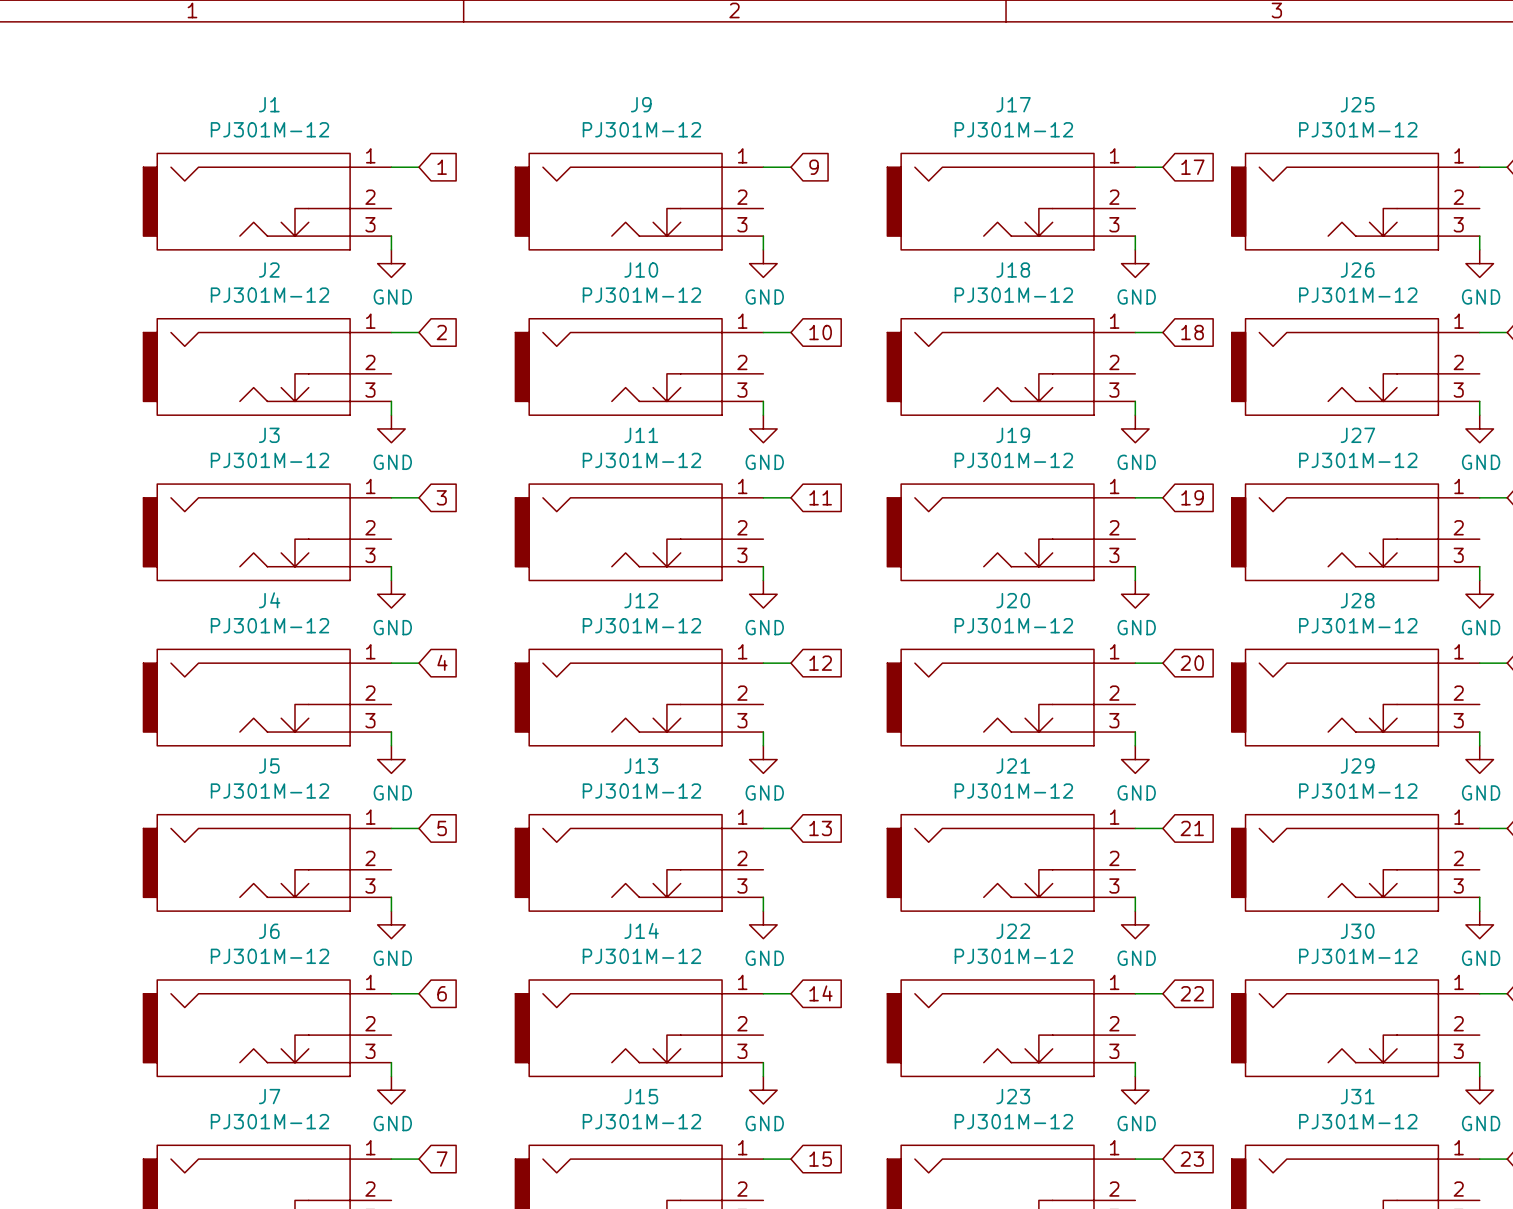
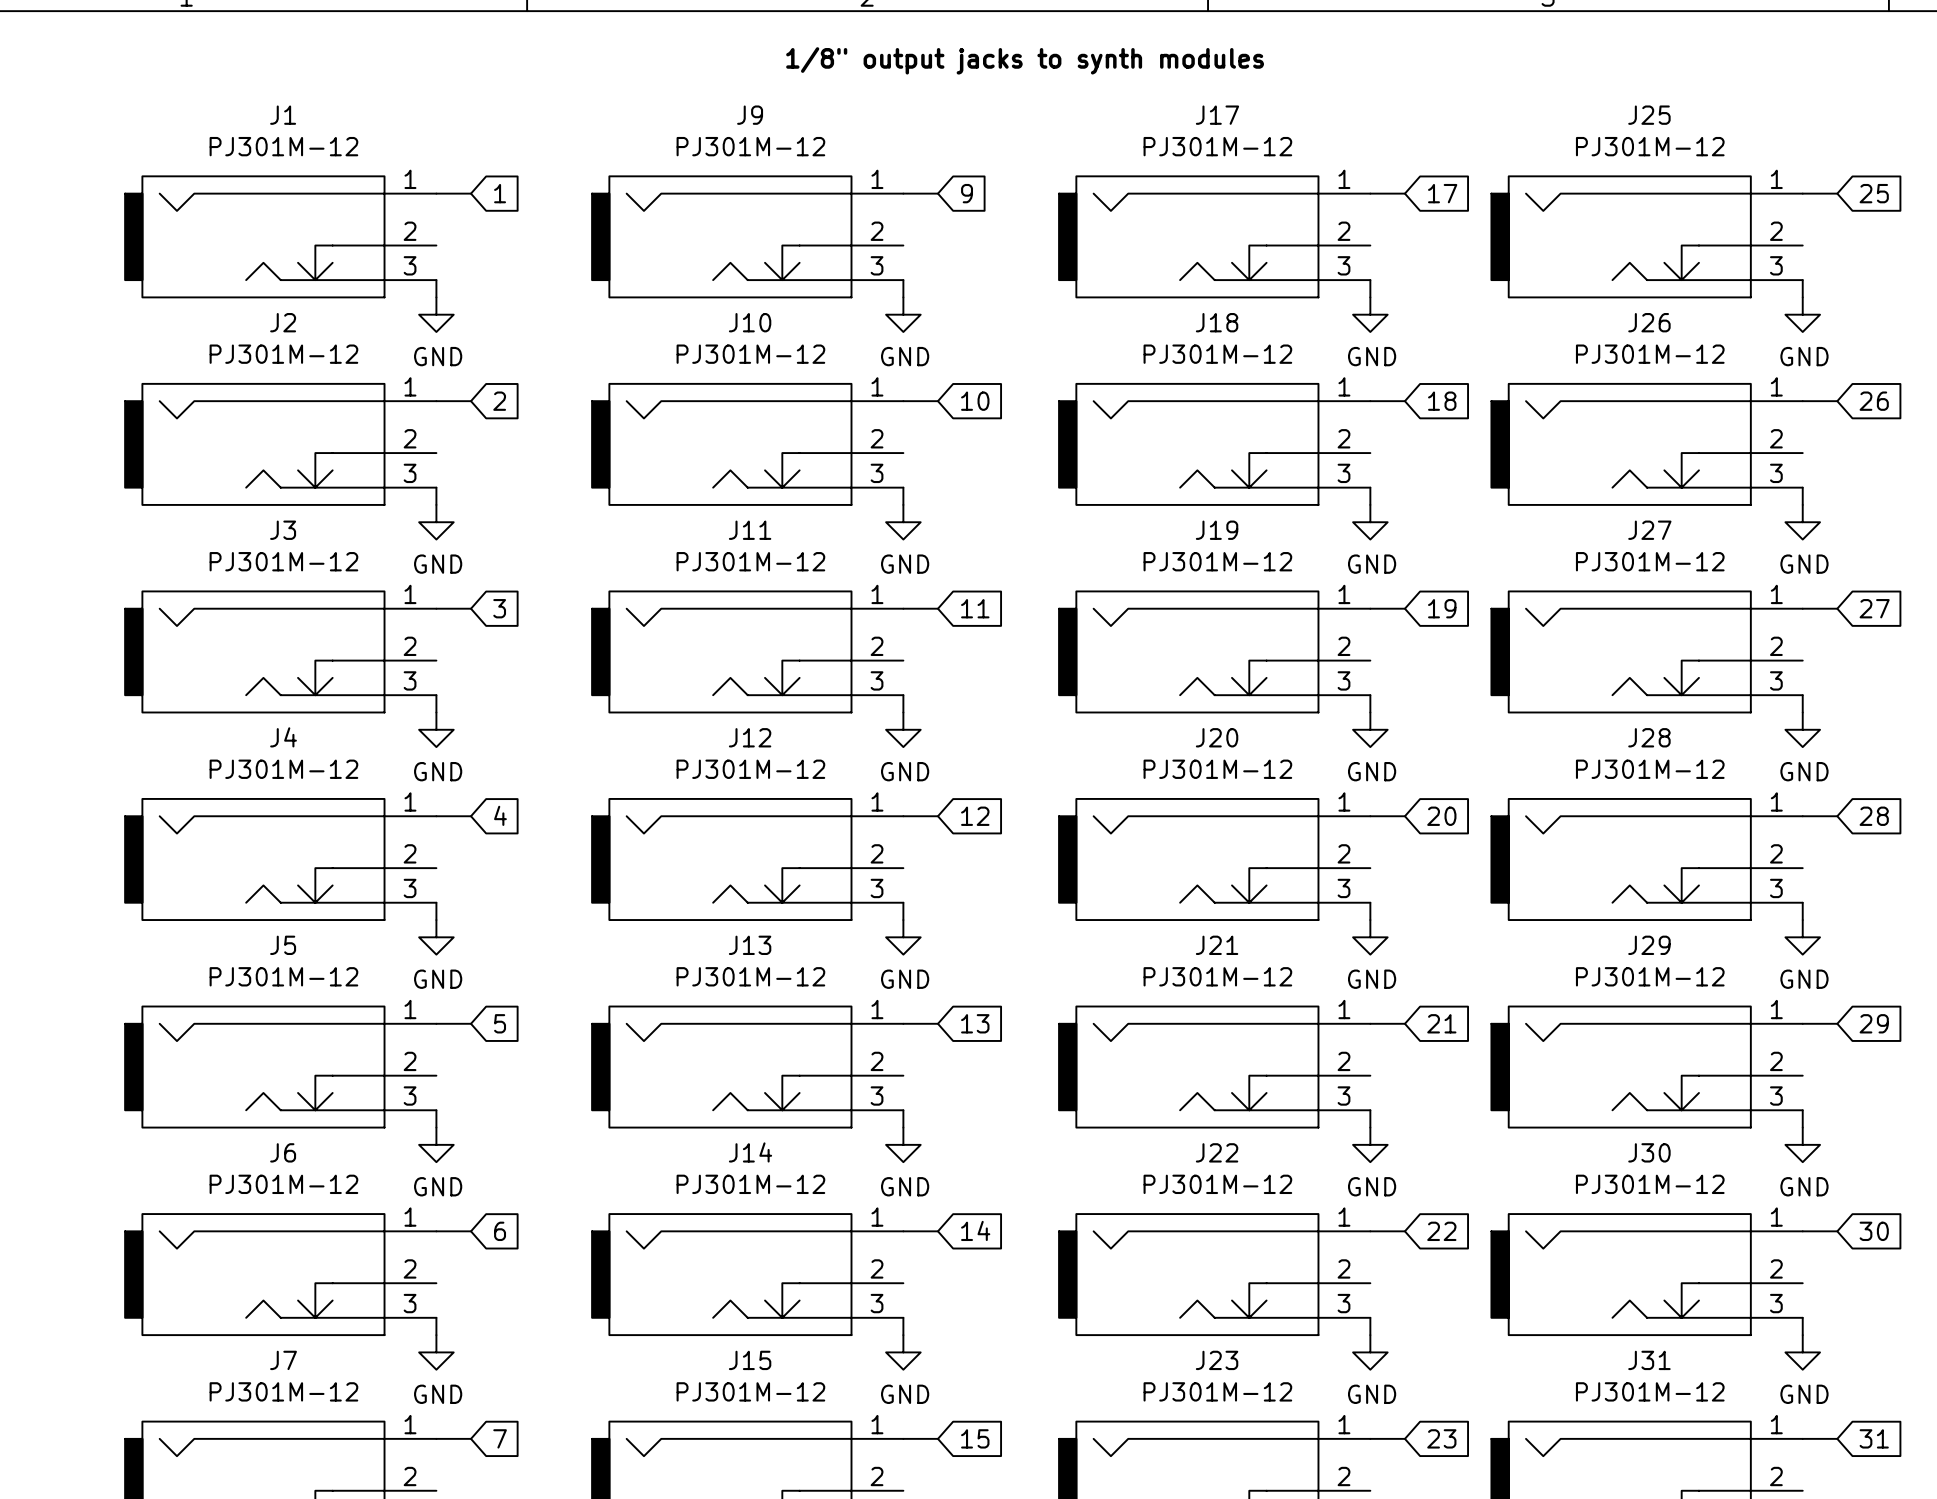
text: none -> 1/8" output jacks to synth modules (1025, 60)

